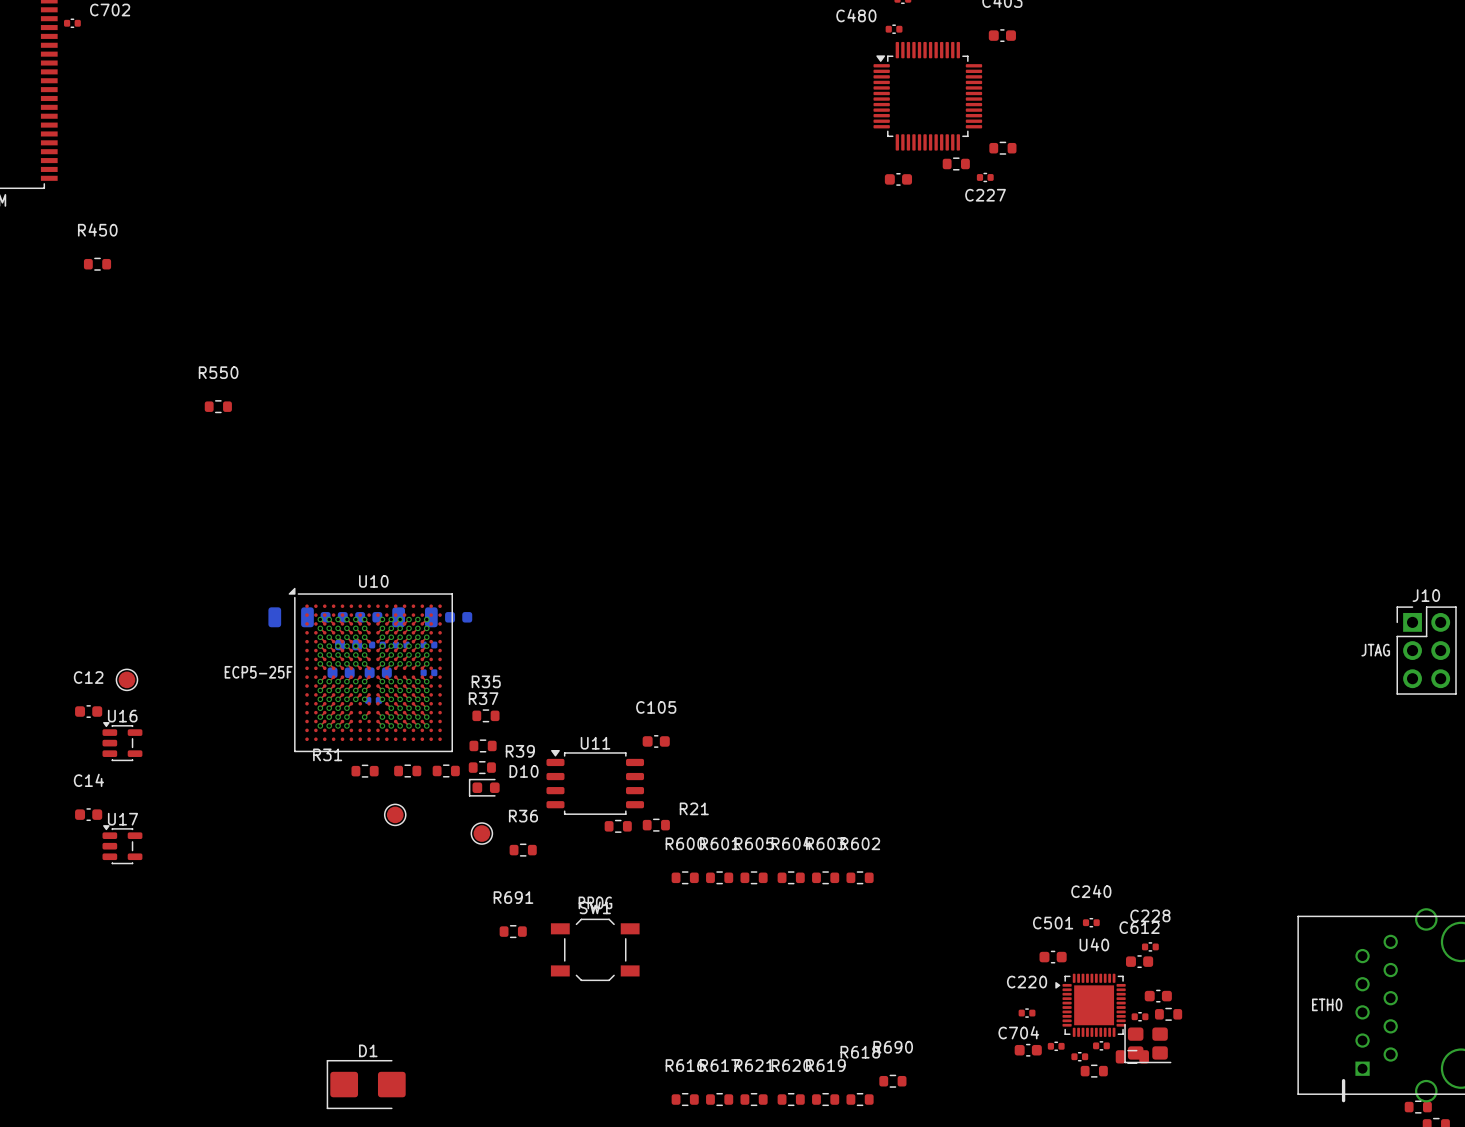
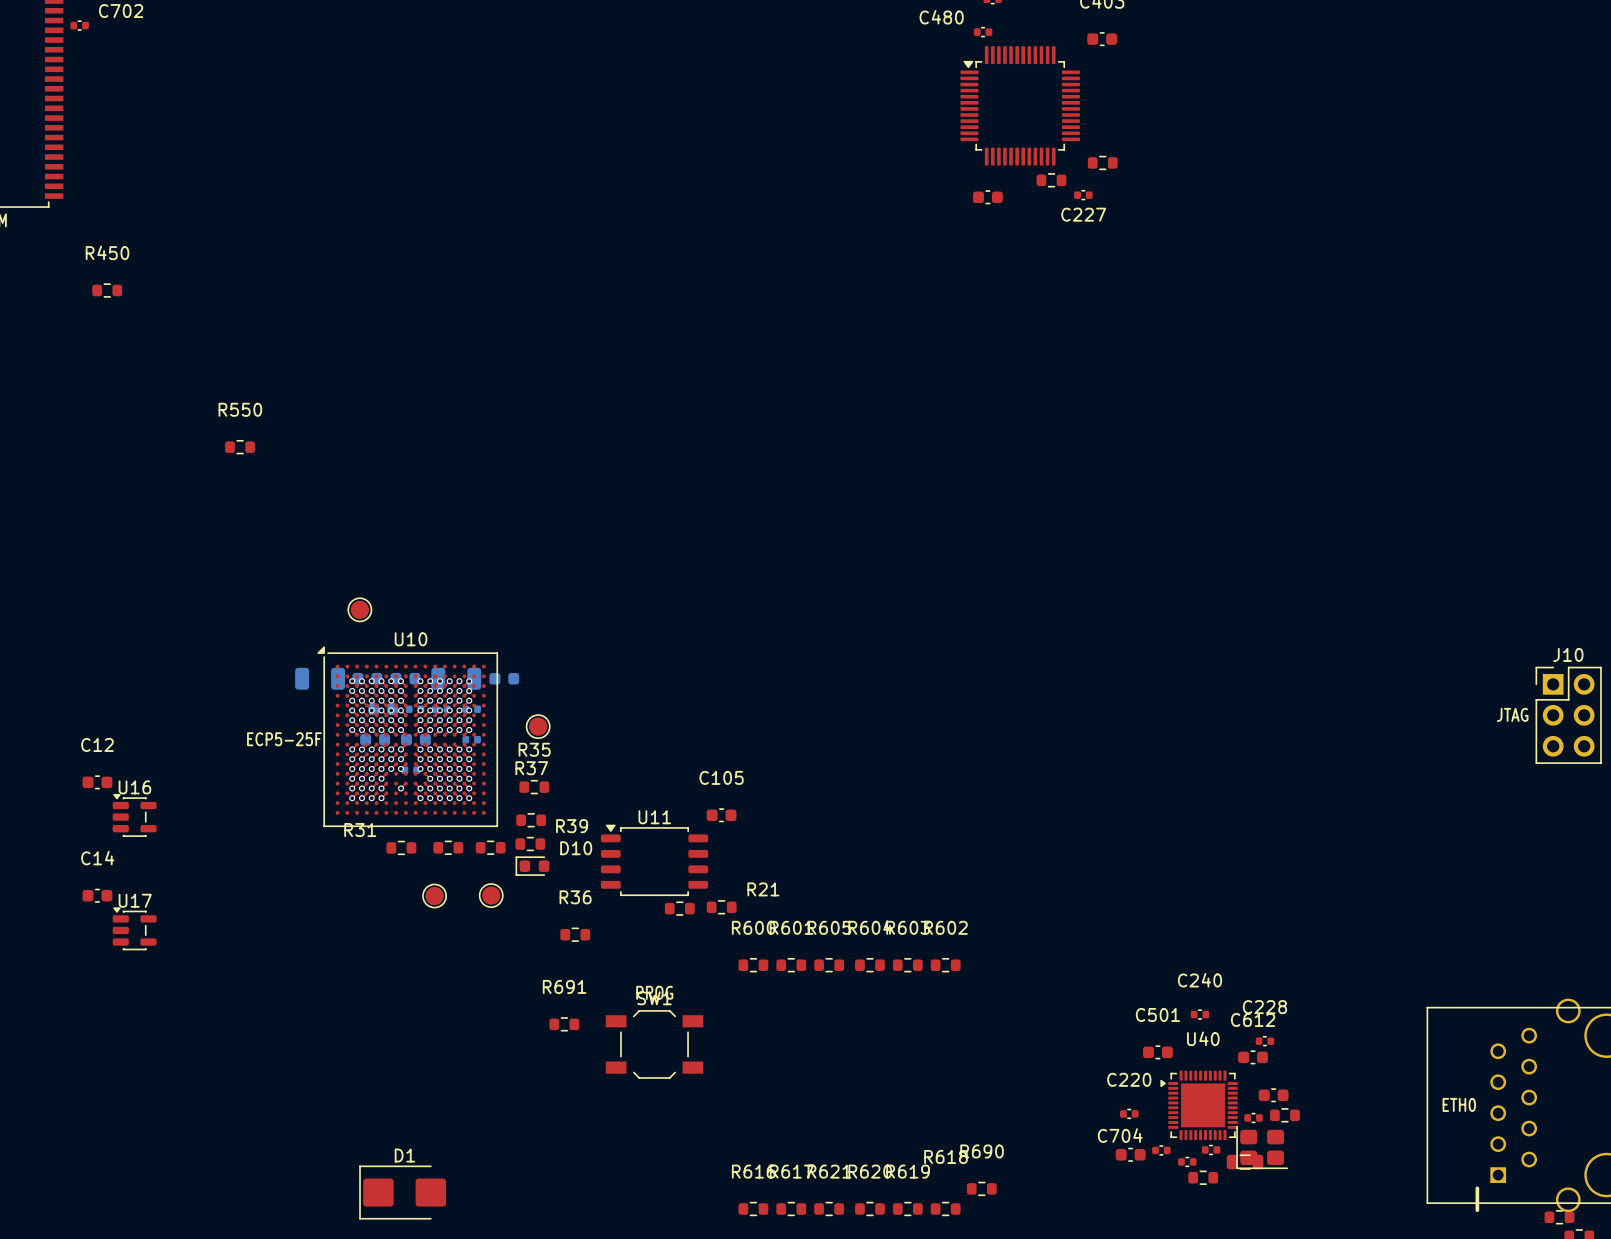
part: none -> (359, 609)
part: none -> (538, 726)
part: (126, 679) -> none
part position: (481, 833) -> (491, 895)

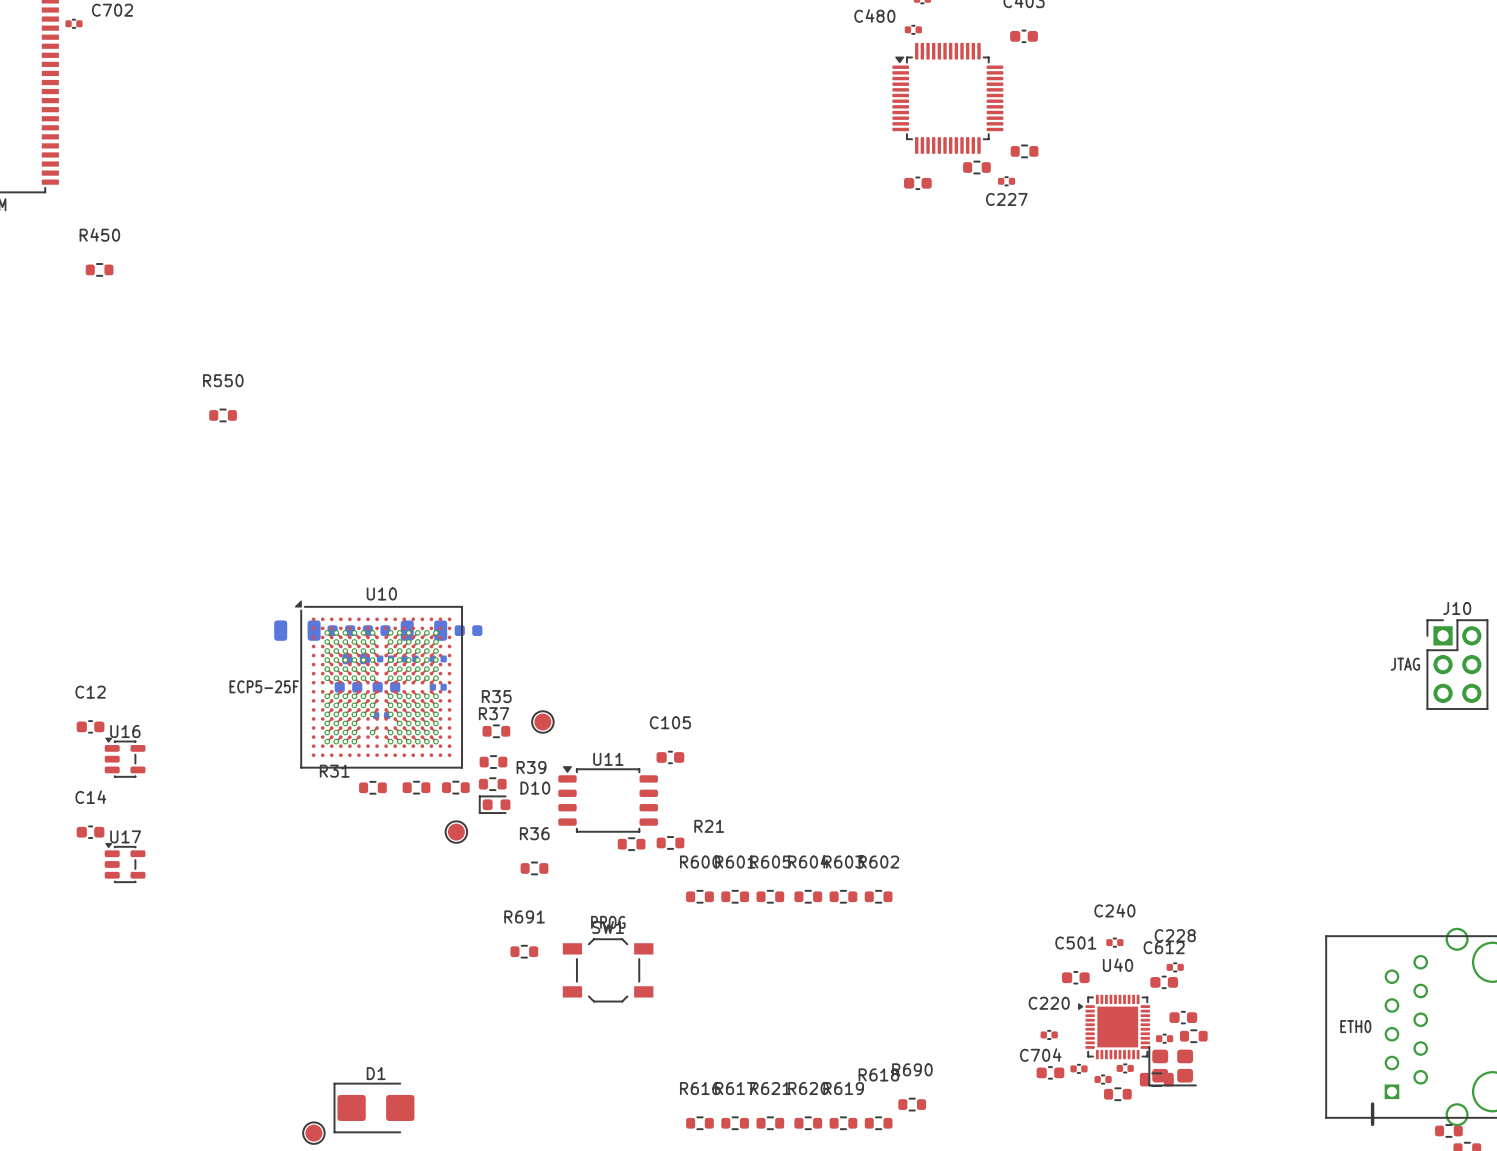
part: (359, 609) -> none
part position: (538, 726) -> (542, 722)
part: (434, 896) -> none
part: none -> (313, 1133)

